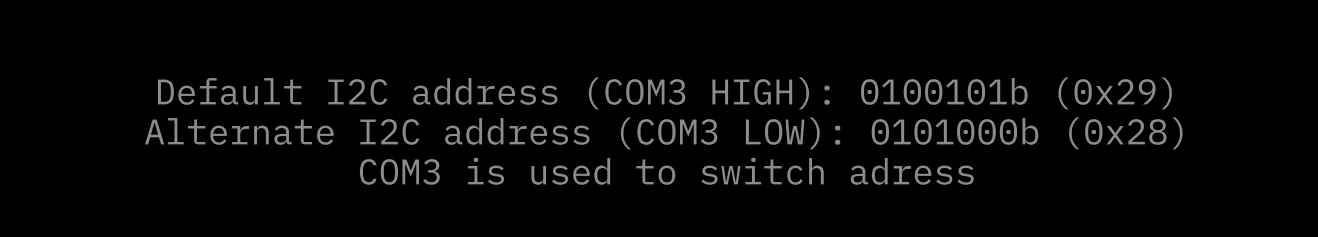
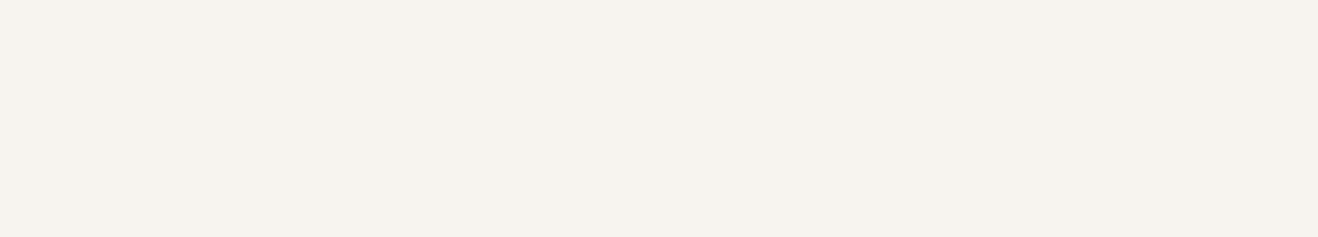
text: Default I2C address (COM3 HIGH): 0100101b (0x29) (664, 93) -> none
text: Alternate I2C address (COM3 LOW): 0101000b (0x28) (663, 133) -> none
text: COM3 is used to switch adress (666, 171) -> none

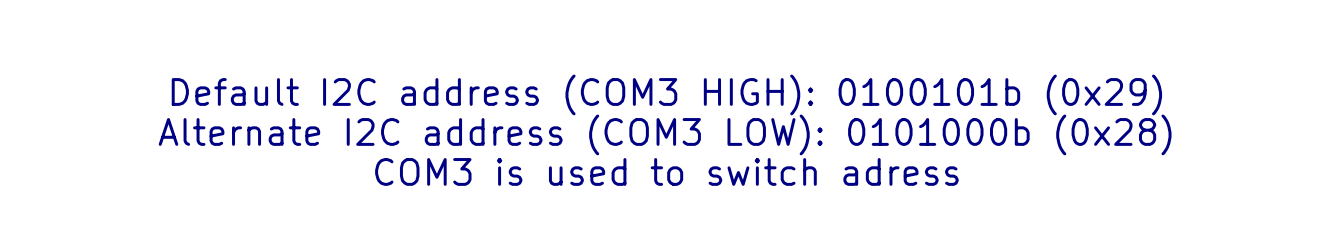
text: none -> Default I2C address (COM3 HIGH): 0100101b (0x29) (666, 94)
text: none -> Alternate I2C address (COM3 LOW): 0101000b (0x28) (665, 134)
text: none -> COM3 is used to switch adress (666, 171)

